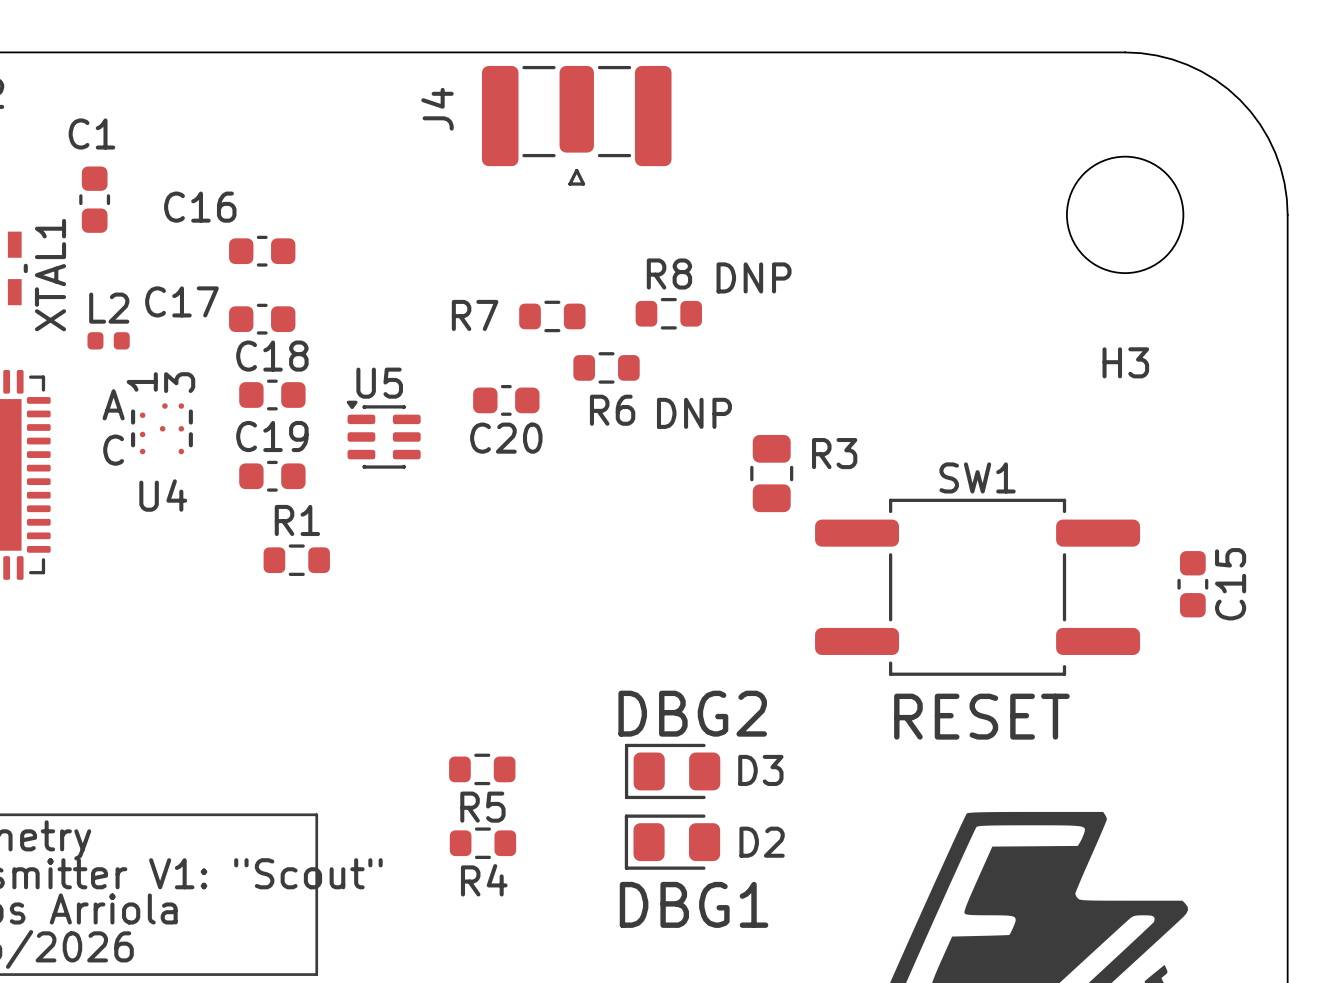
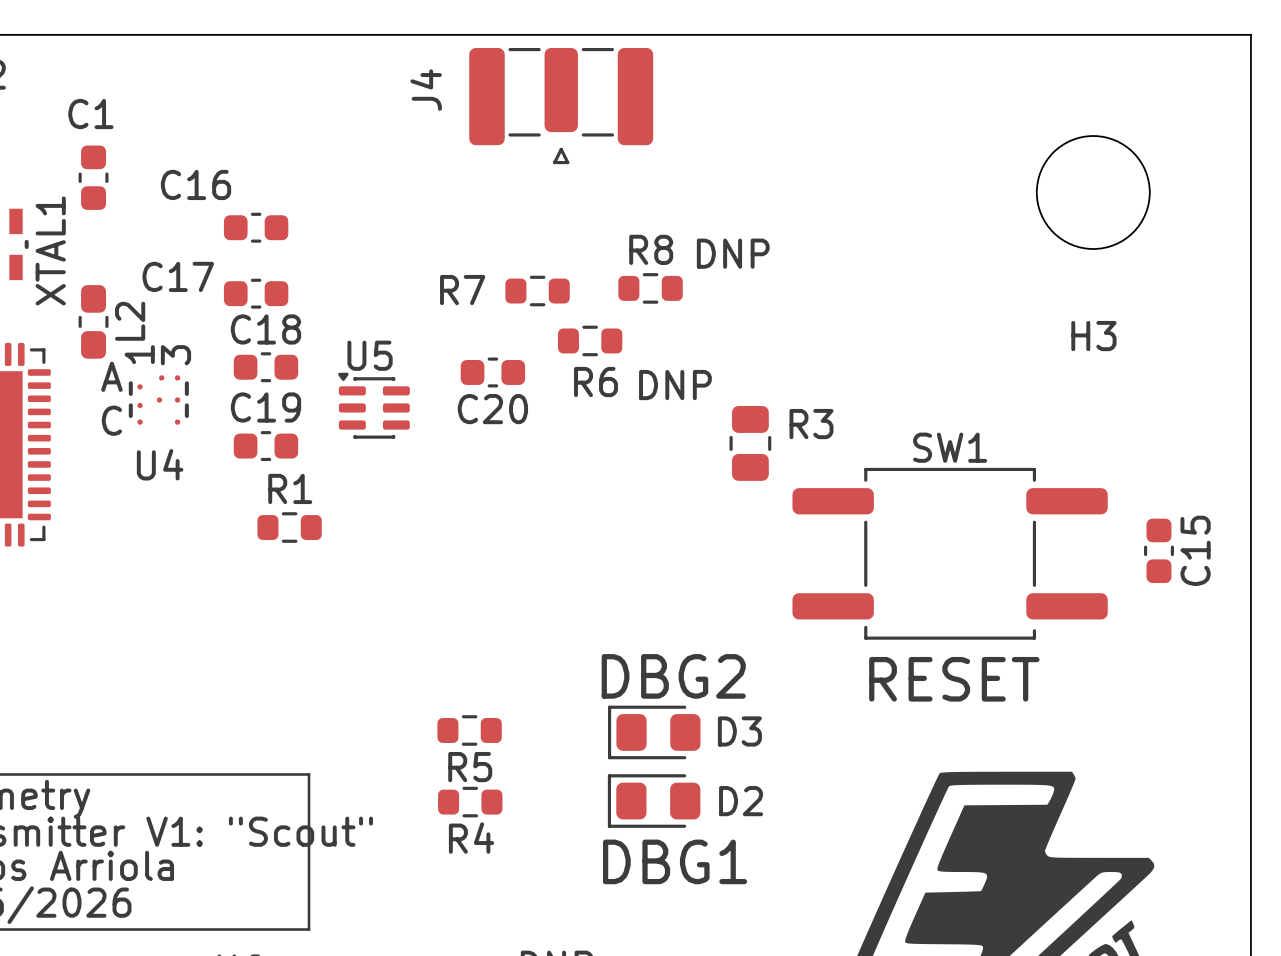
board edge: (1125, 52) (1156, 55) (1187, 64) (1215, 79) (1240, 99) (1260, 124) (1275, 152) (1284, 183) (1287, 214) -> (1093, 34) (1250, 34) (1250, 192)
L2 footprint: [87, 332, 130, 350] -> [78, 285, 109, 359]

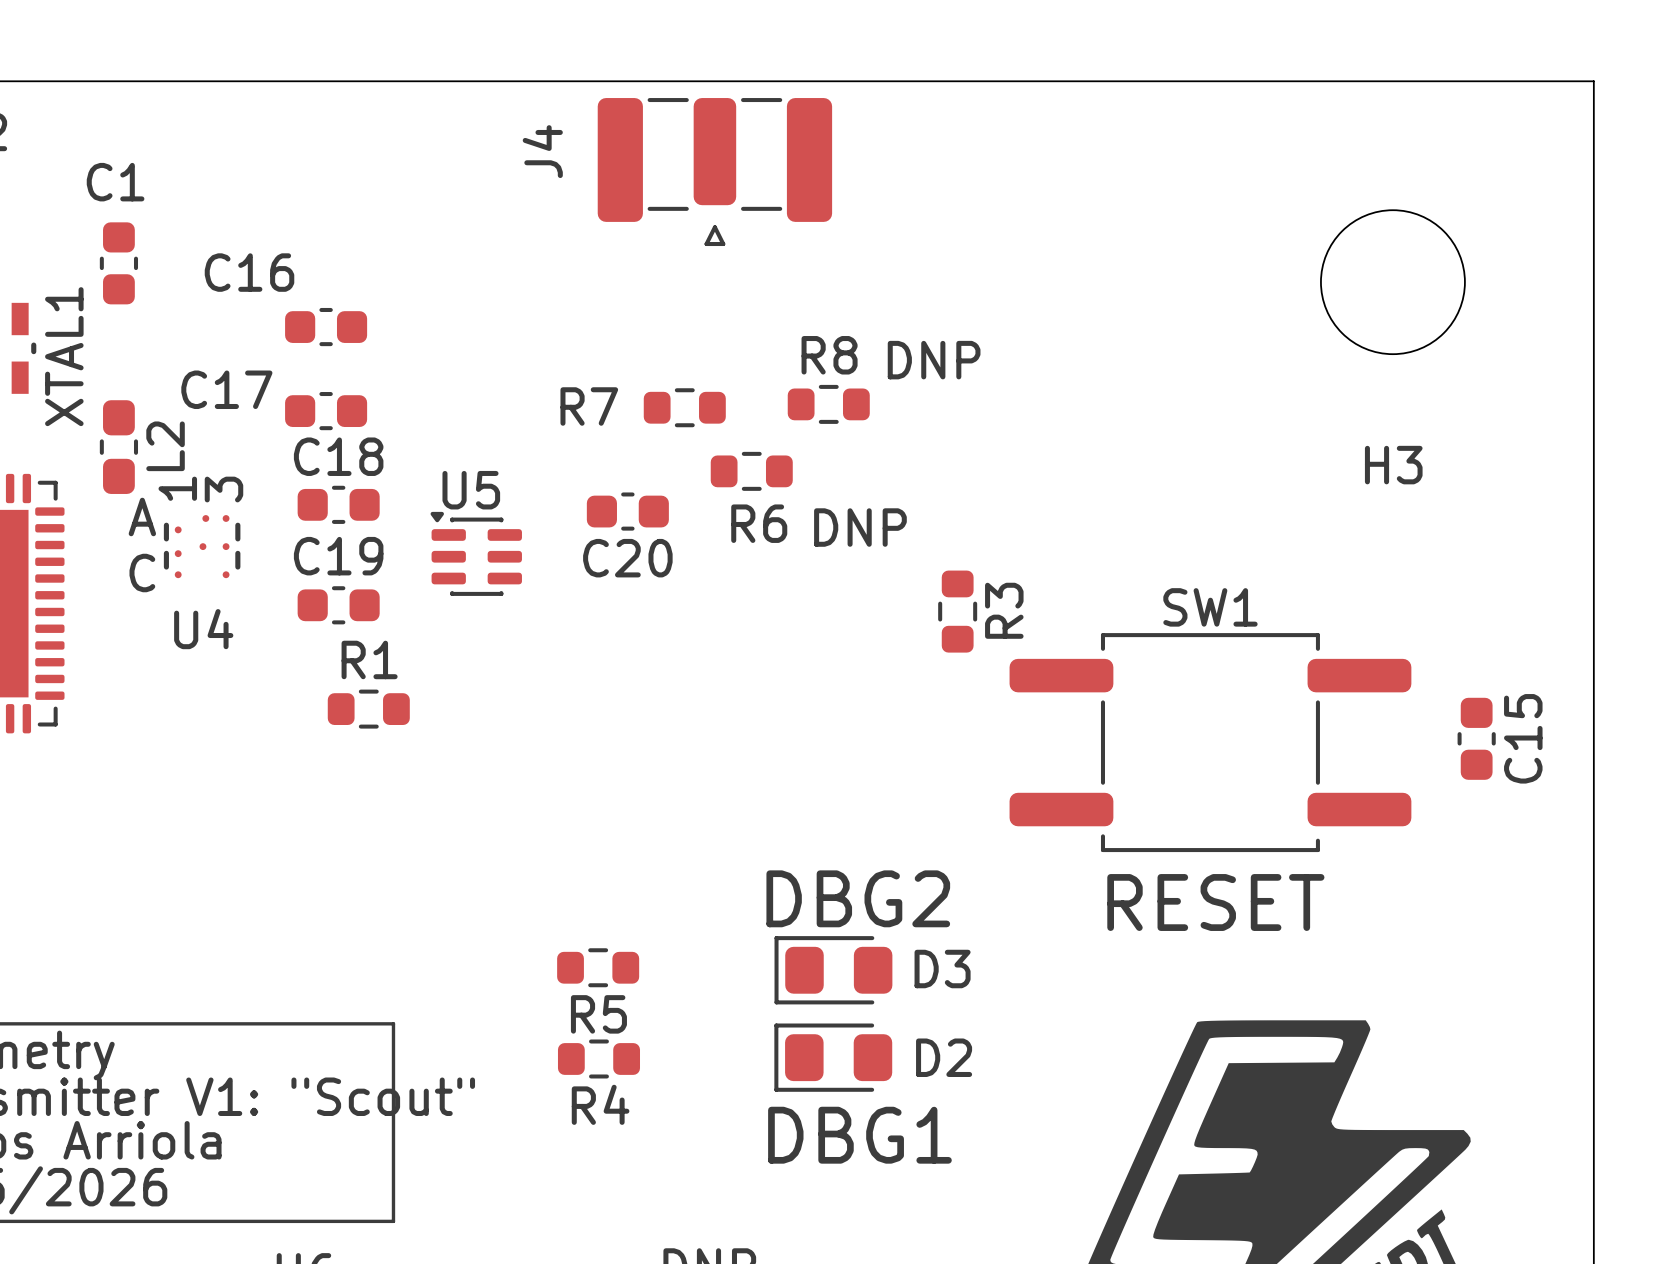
R3 footprint: [729, 405, 772, 481] -> [938, 570, 978, 653]
R3 name rotation: 0° (811, 424) -> 90° counterclockwise (1004, 610)

